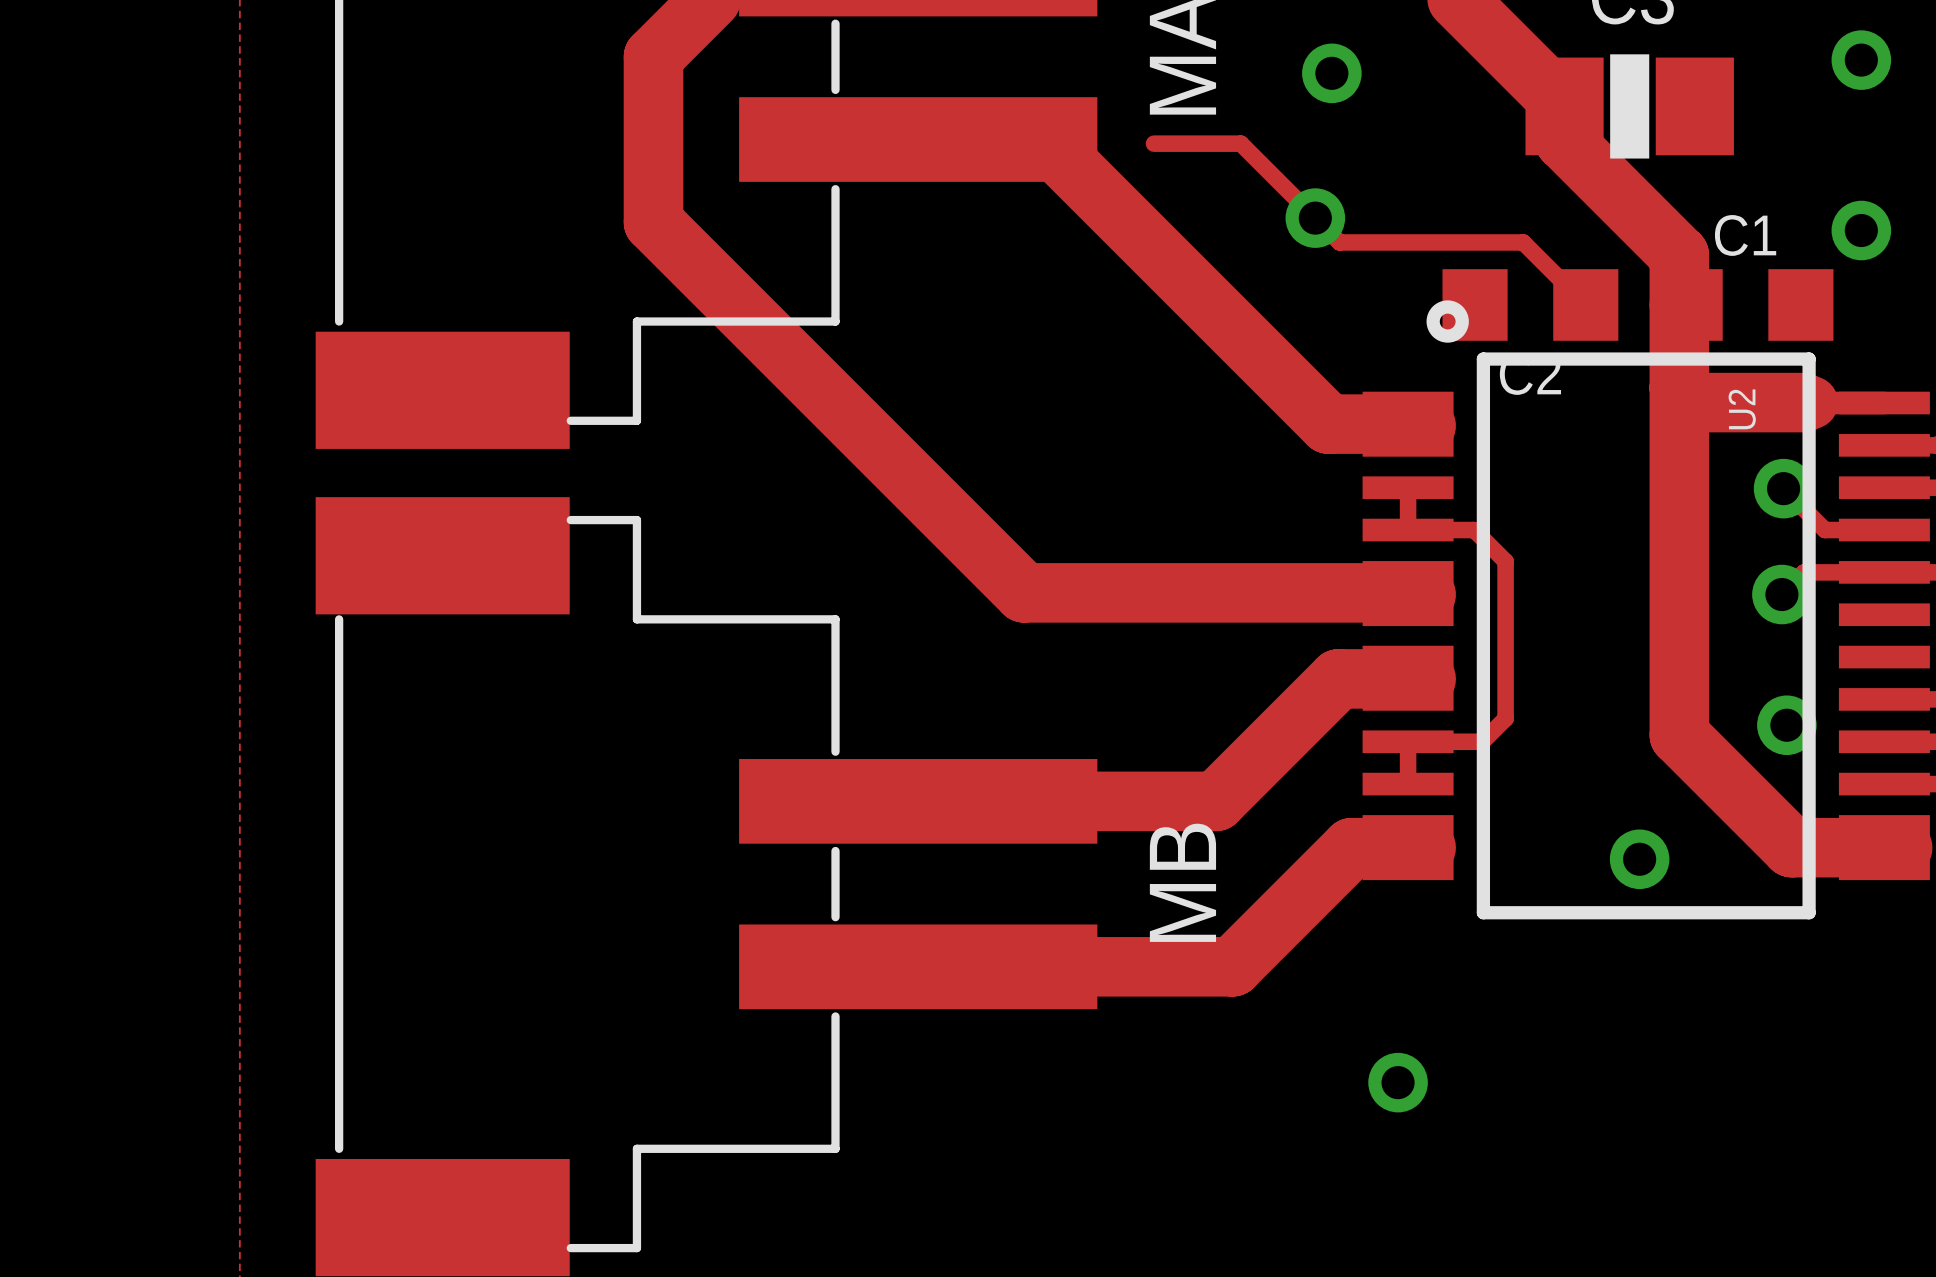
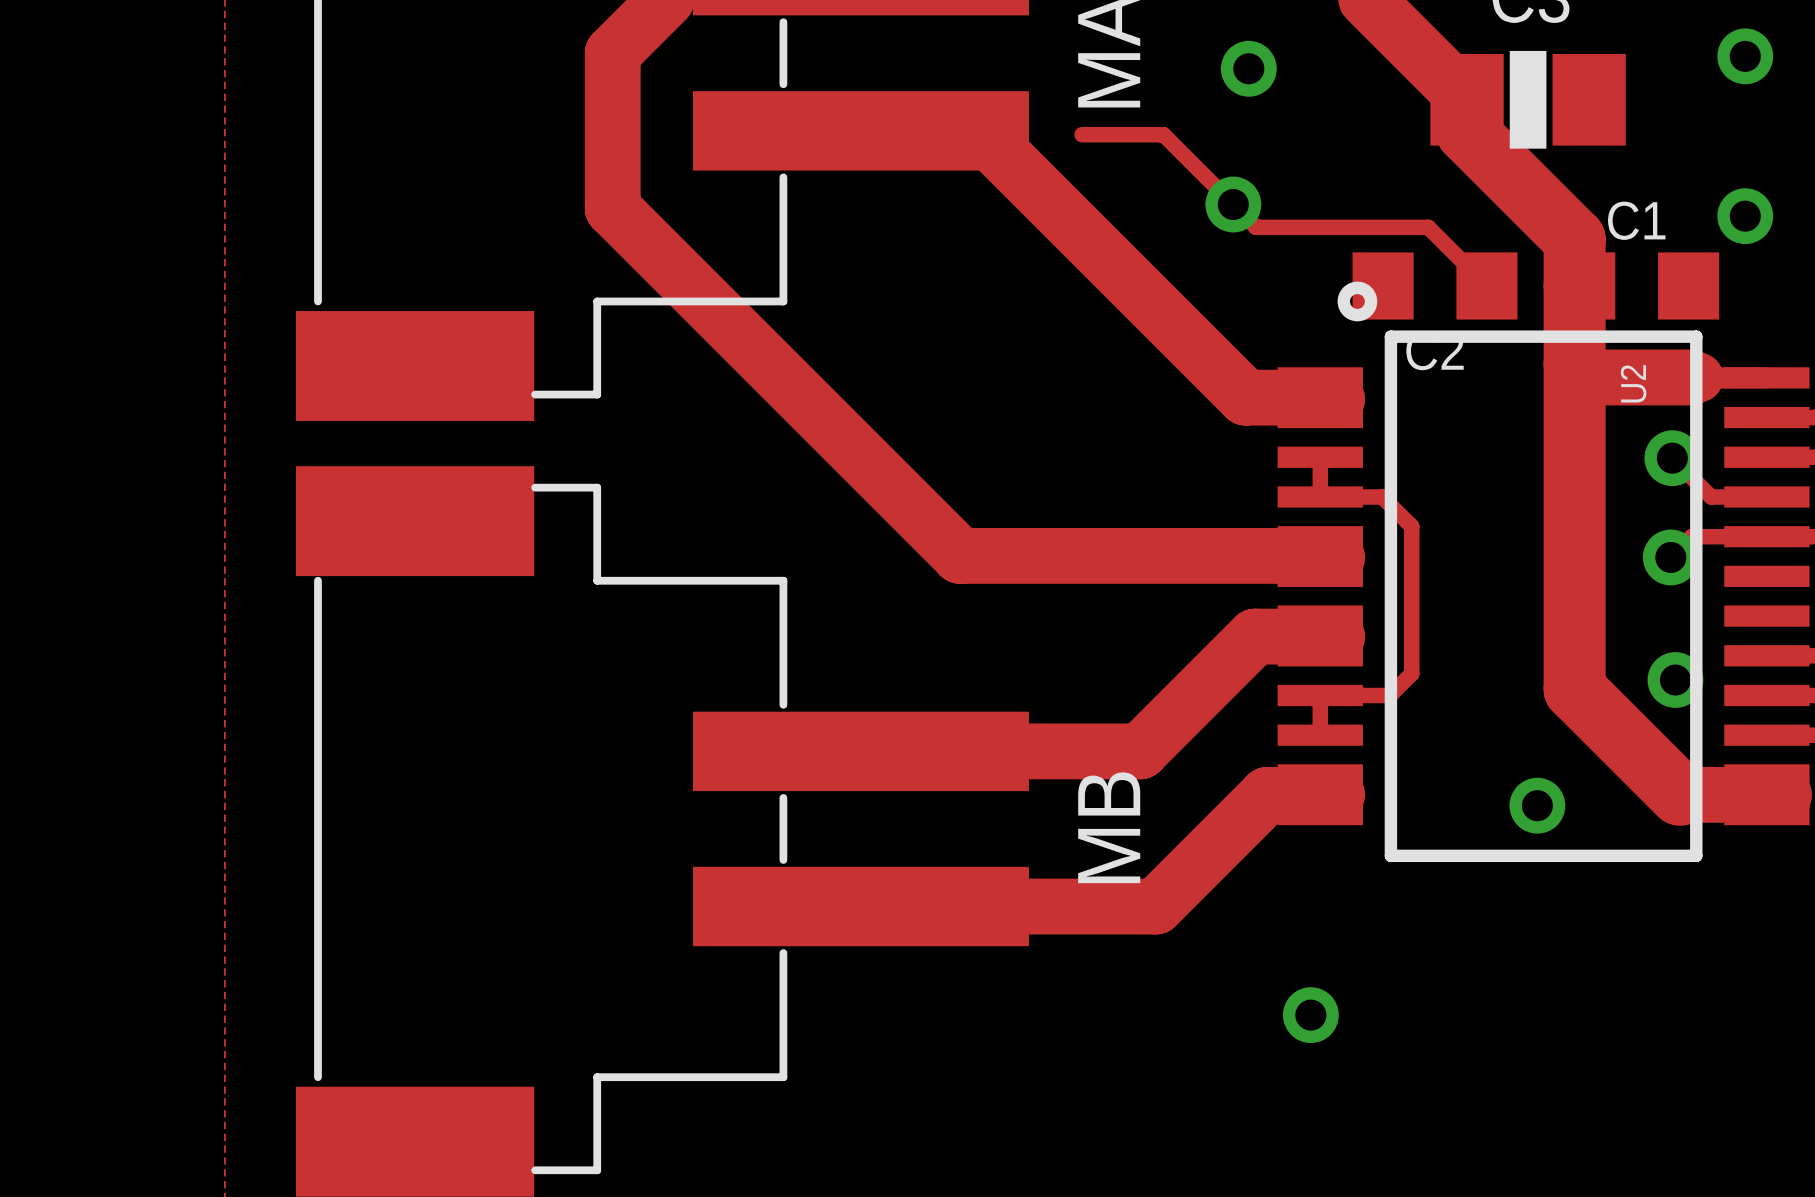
track width: thin (1564, 106) (1564, 140) (1679, 255) (1679, 735) (1791, 847) -> thick (1467, 99) (1467, 131) (1574, 239) (1574, 689) (1680, 794)

